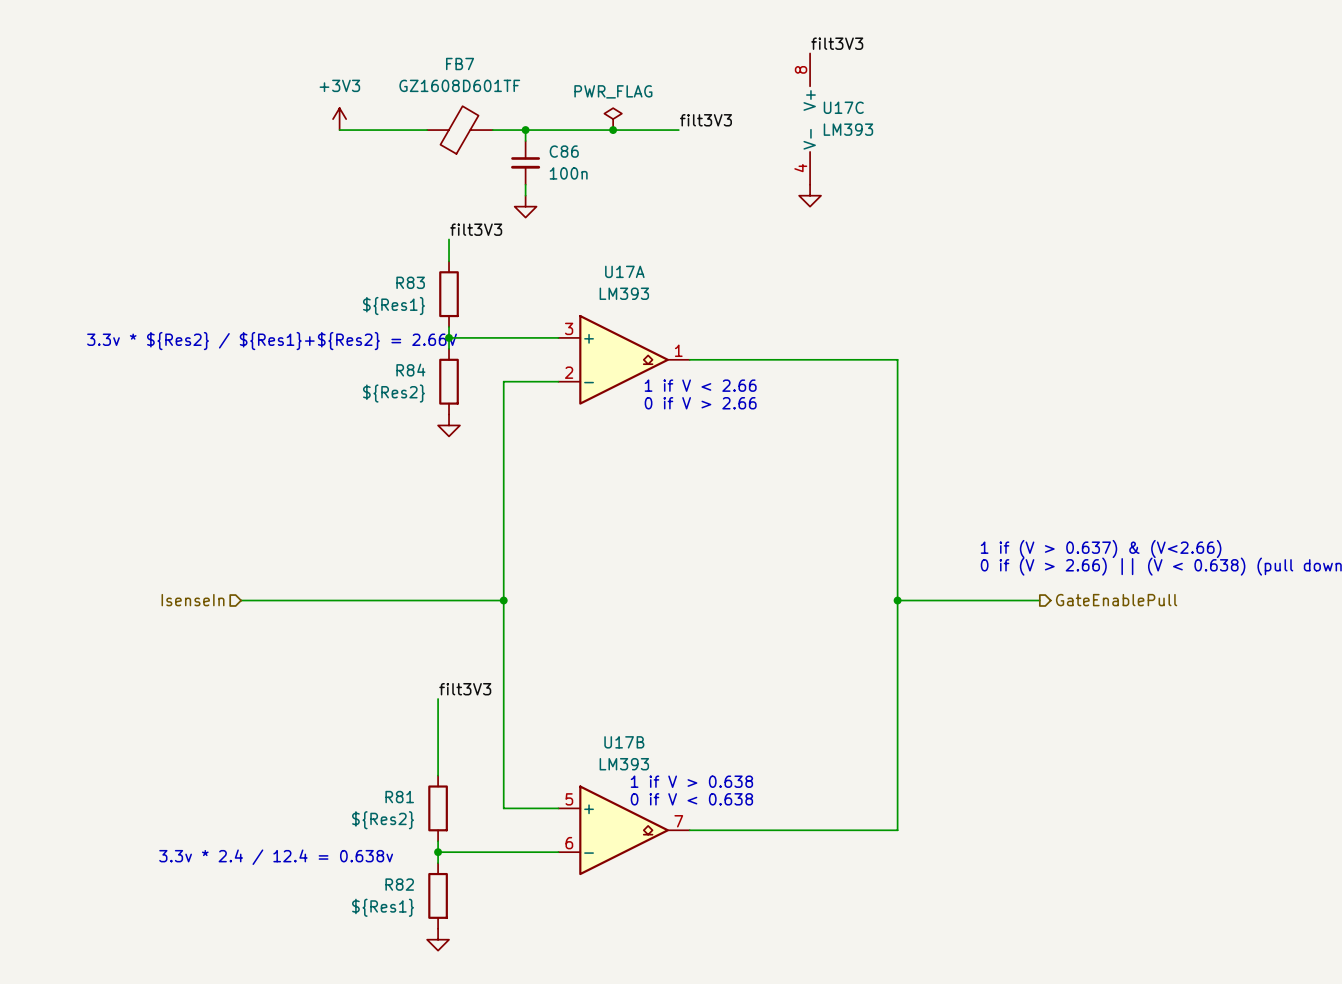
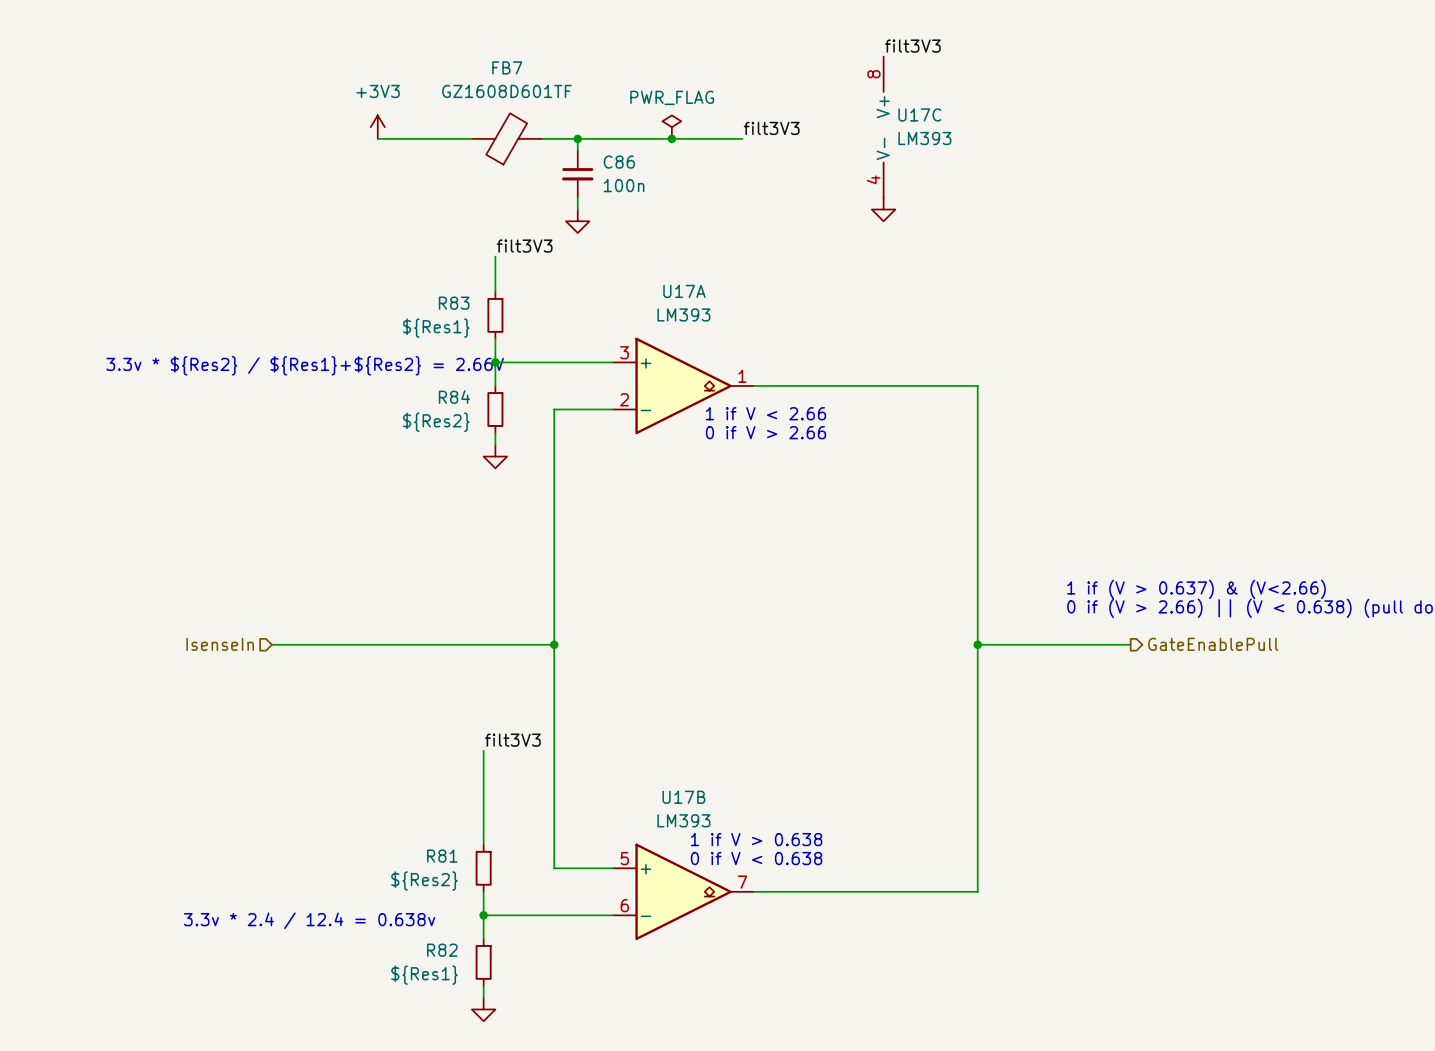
R83 symbol: [439, 261, 459, 327] -> [487, 291, 504, 339]
R84 symbol: [439, 348, 459, 415] -> [487, 385, 504, 434]
R81 symbol: [428, 775, 448, 842] -> [475, 844, 492, 892]
R82 symbol: [428, 863, 448, 929] -> [475, 938, 492, 986]

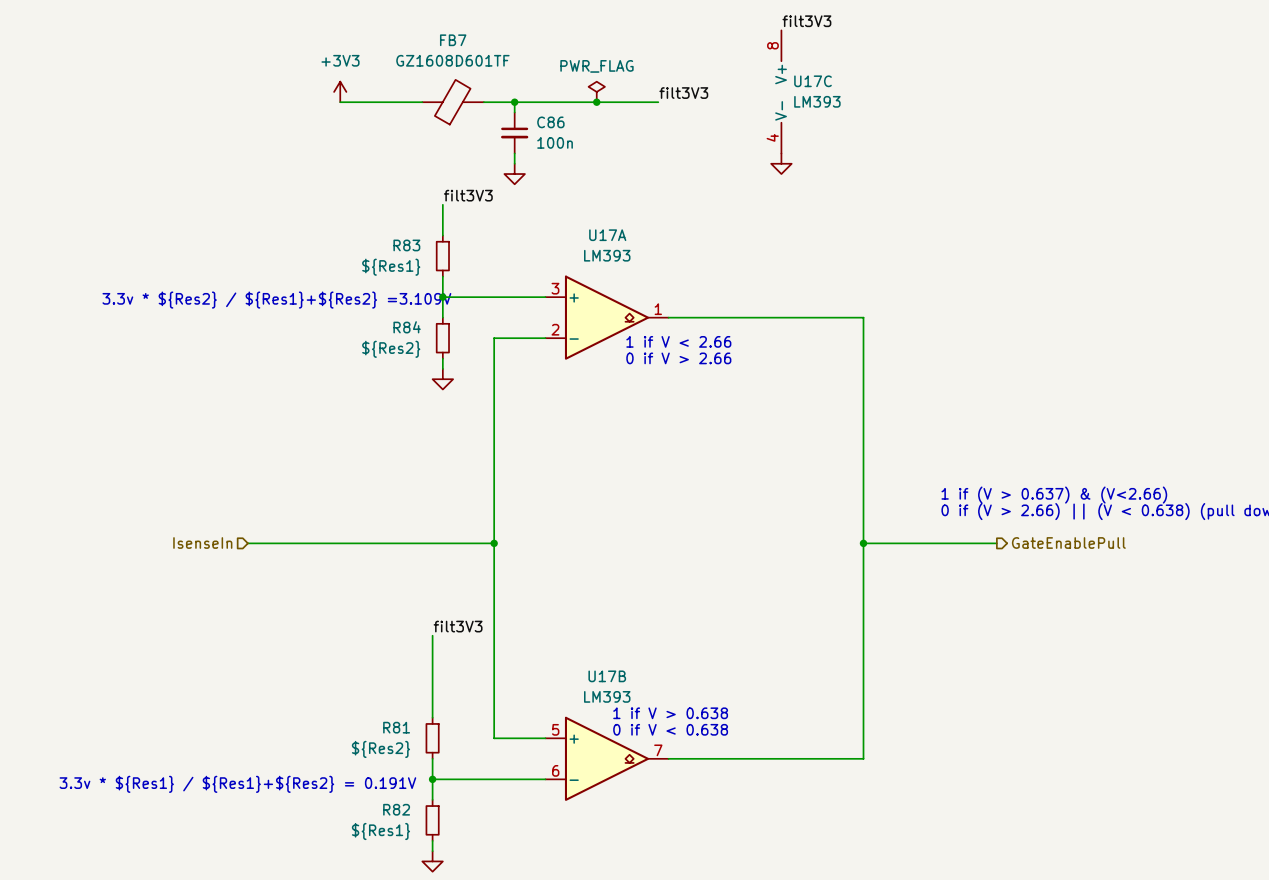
text: 3.3v * ${Res2} / ${Res1}+${Res2} = 2.66V (305, 365) -> 3.3v * ${Res2} / ${Res1}+${Res2} =3.109V (276, 300)
text: 3.3v * 2.4 / 12.4 = 0.638v (309, 920) -> none
text: none -> 3.3v * ${Res1} / ${Res1}+${Res2} = 0.191V (237, 784)

